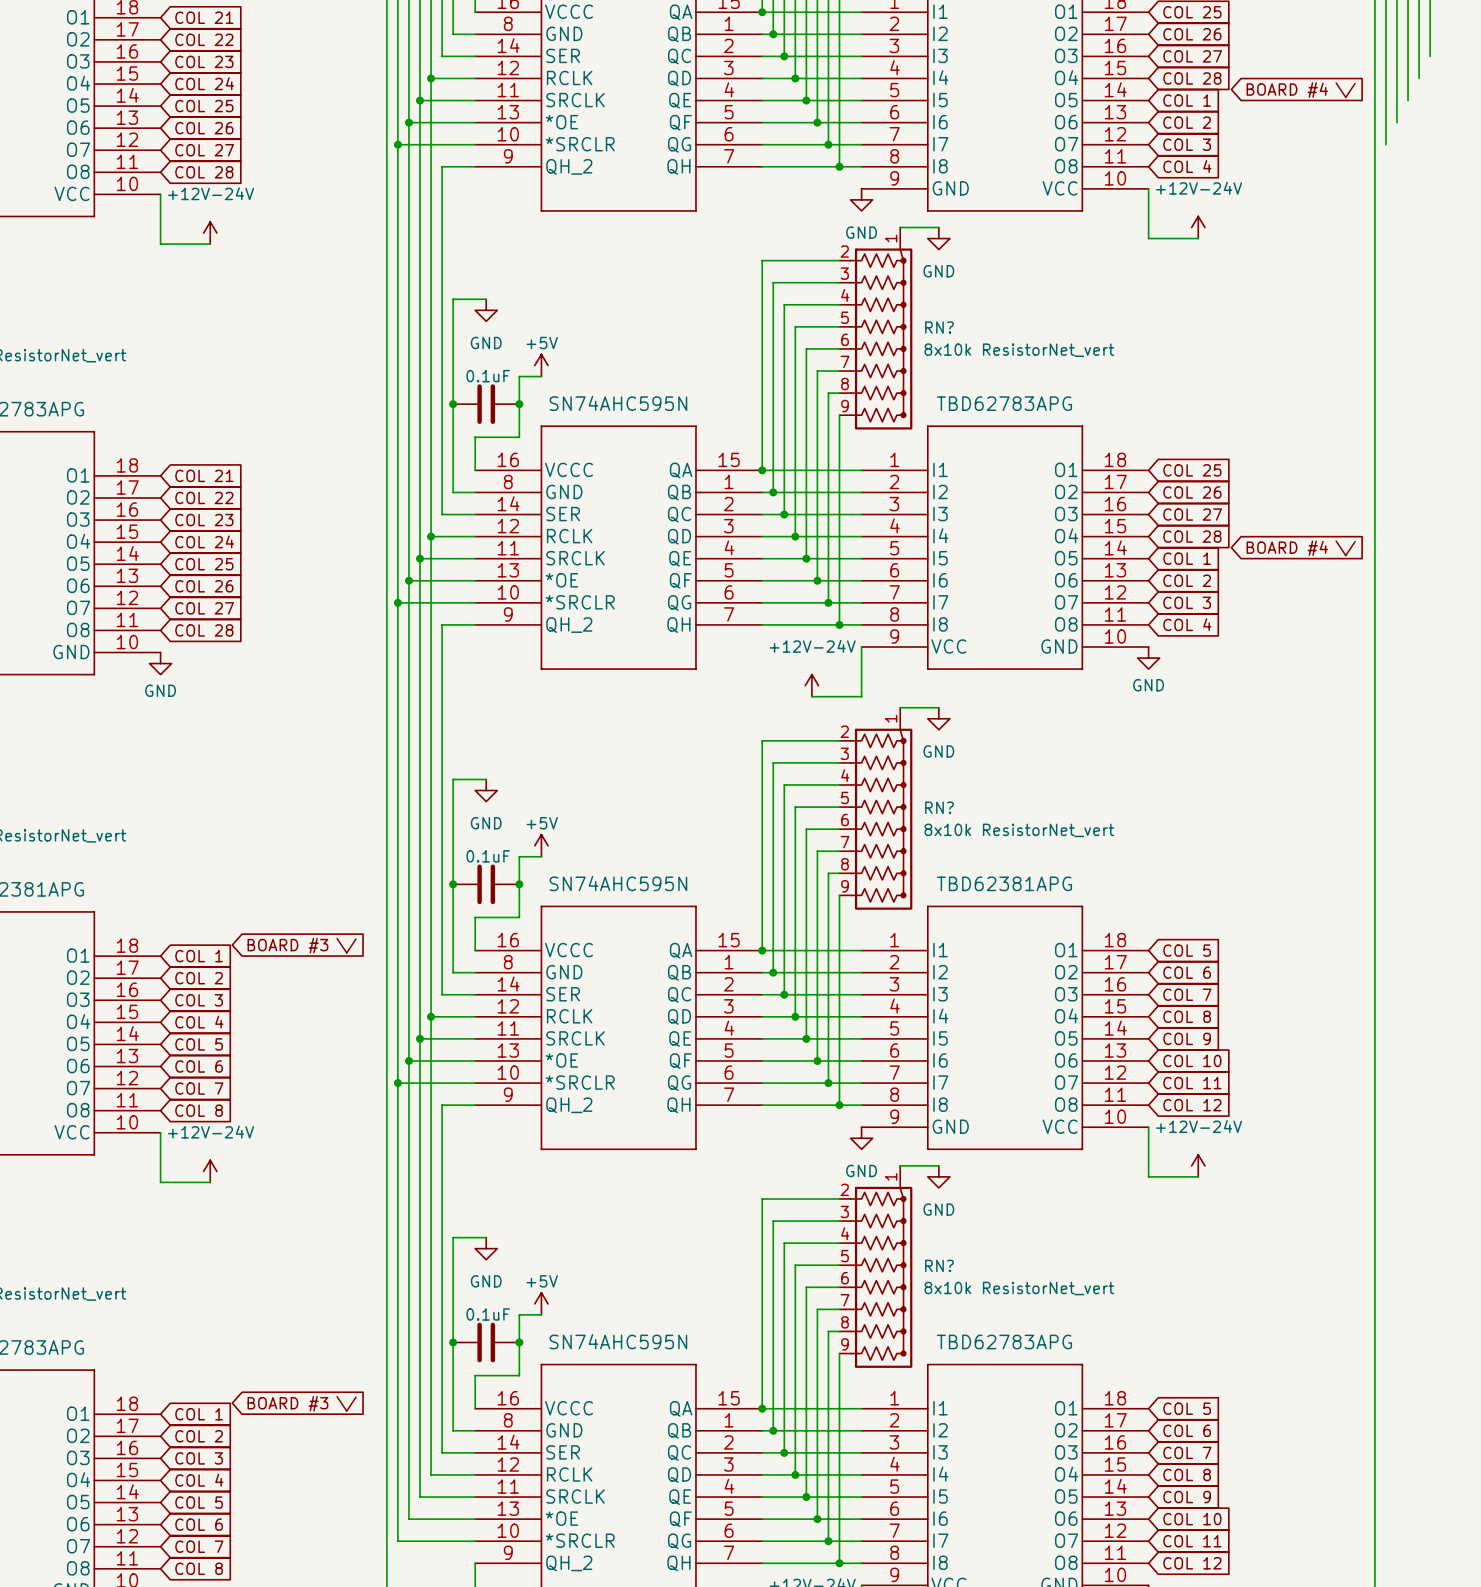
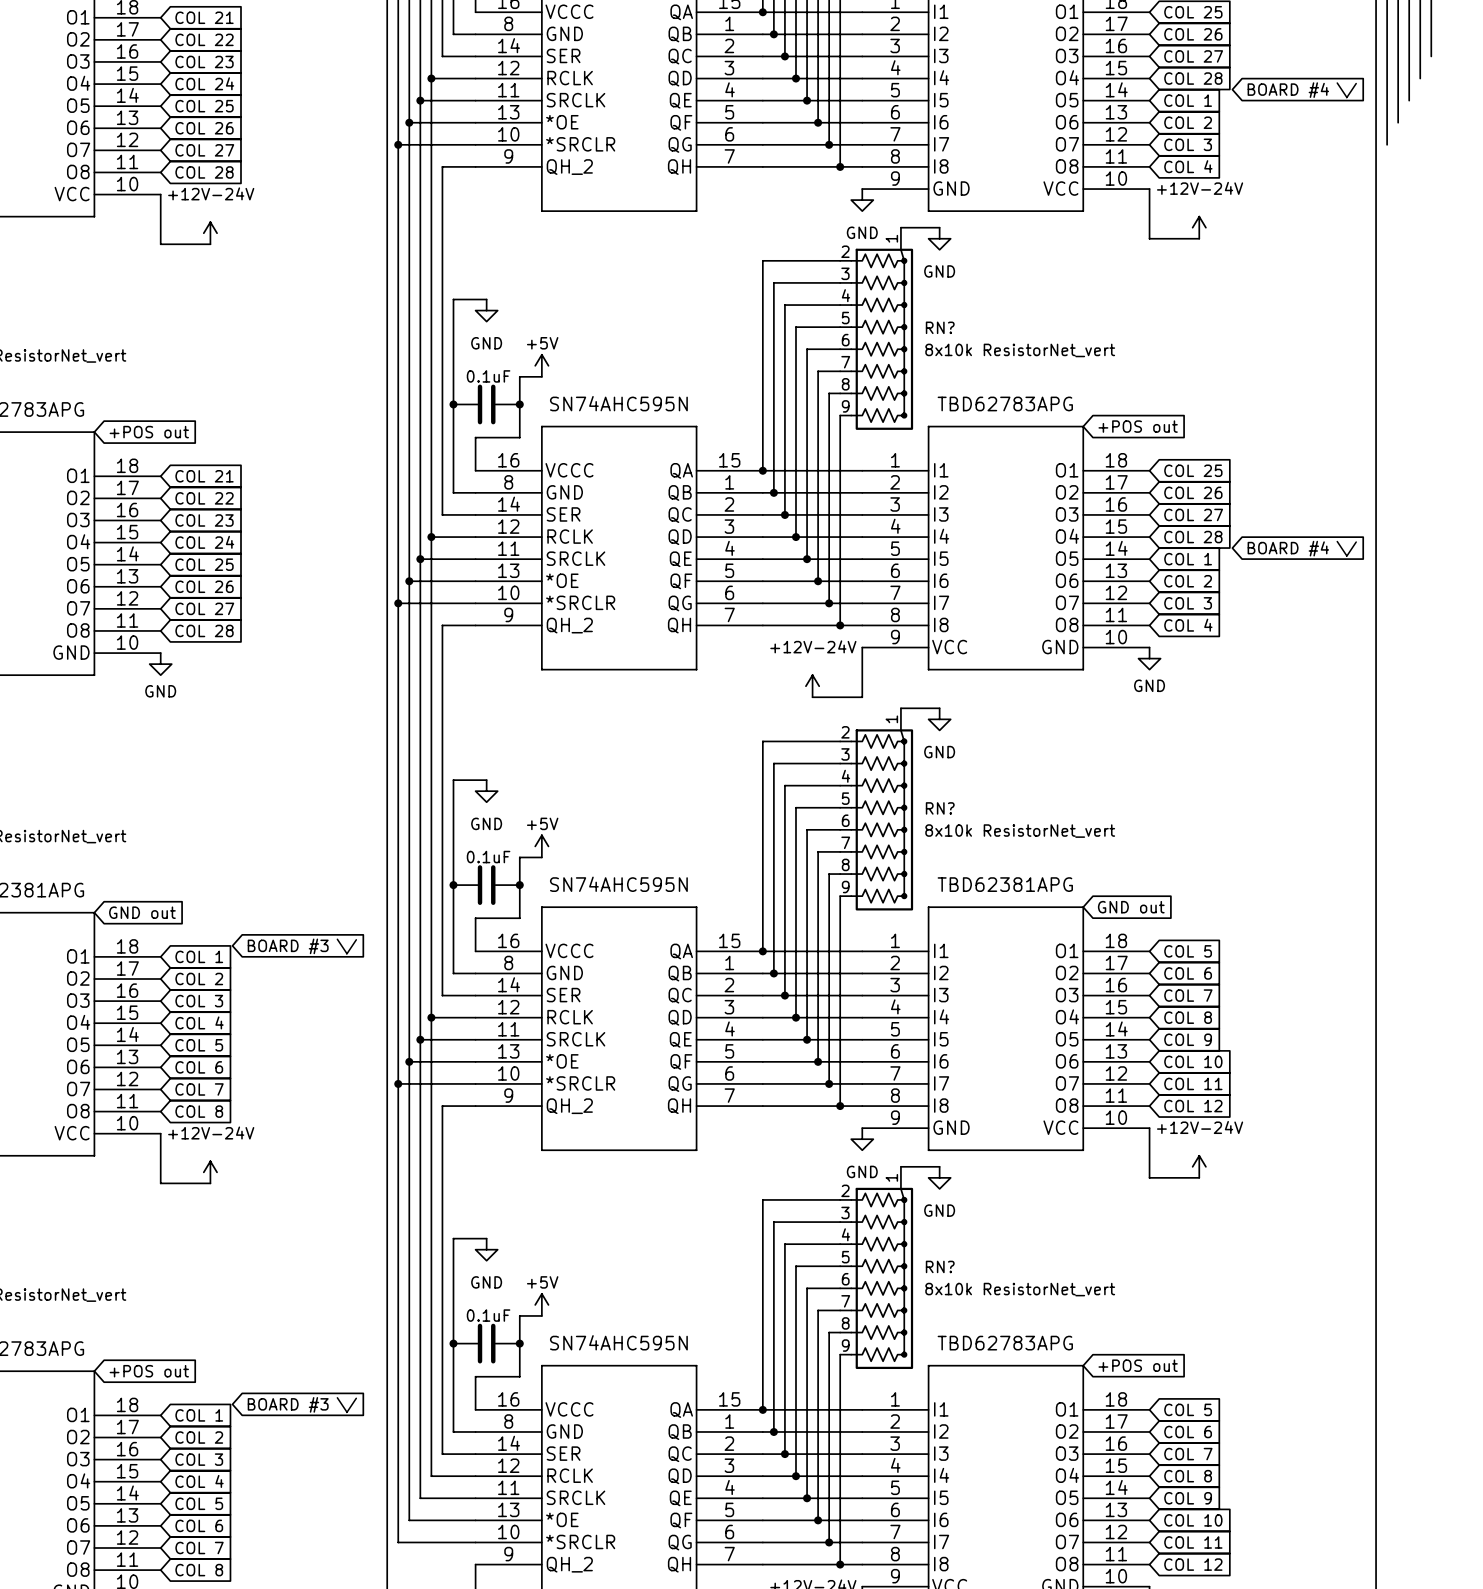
global label: none -> +POS out (1138, 426)
global label: none -> +POS out (149, 432)
global label: none -> GND out (1131, 907)
global label: none -> GND out (142, 912)
global label: none -> +POS out (1138, 1365)
global label: none -> +POS out (149, 1371)

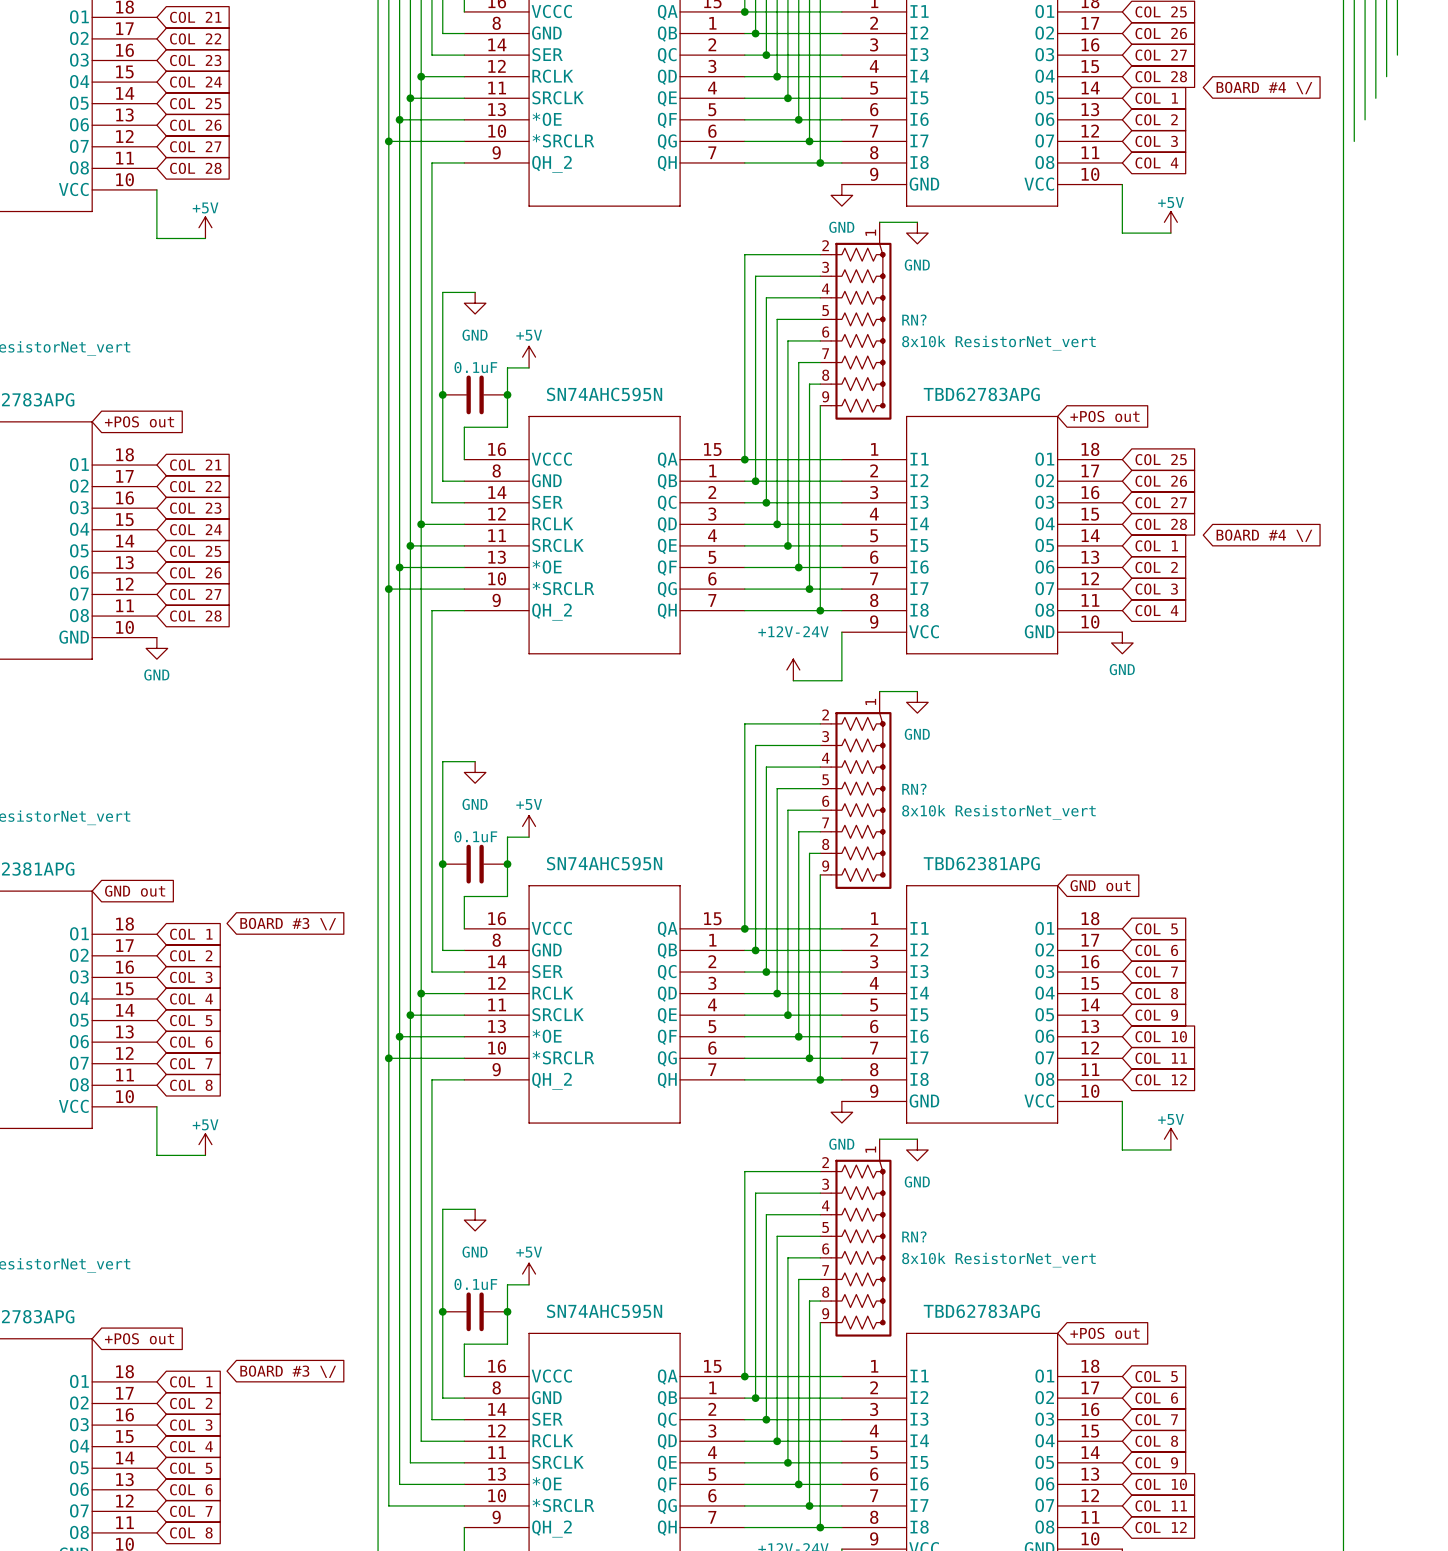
power symbol: +12V-24V (1199, 227) -> +5V (1170, 222)
power symbol: +12V-24V (210, 233) -> +5V (205, 227)
power symbol: +12V-24V (1199, 1166) -> +5V (1170, 1139)
power symbol: +12V-24V (210, 1172) -> +5V (205, 1144)

